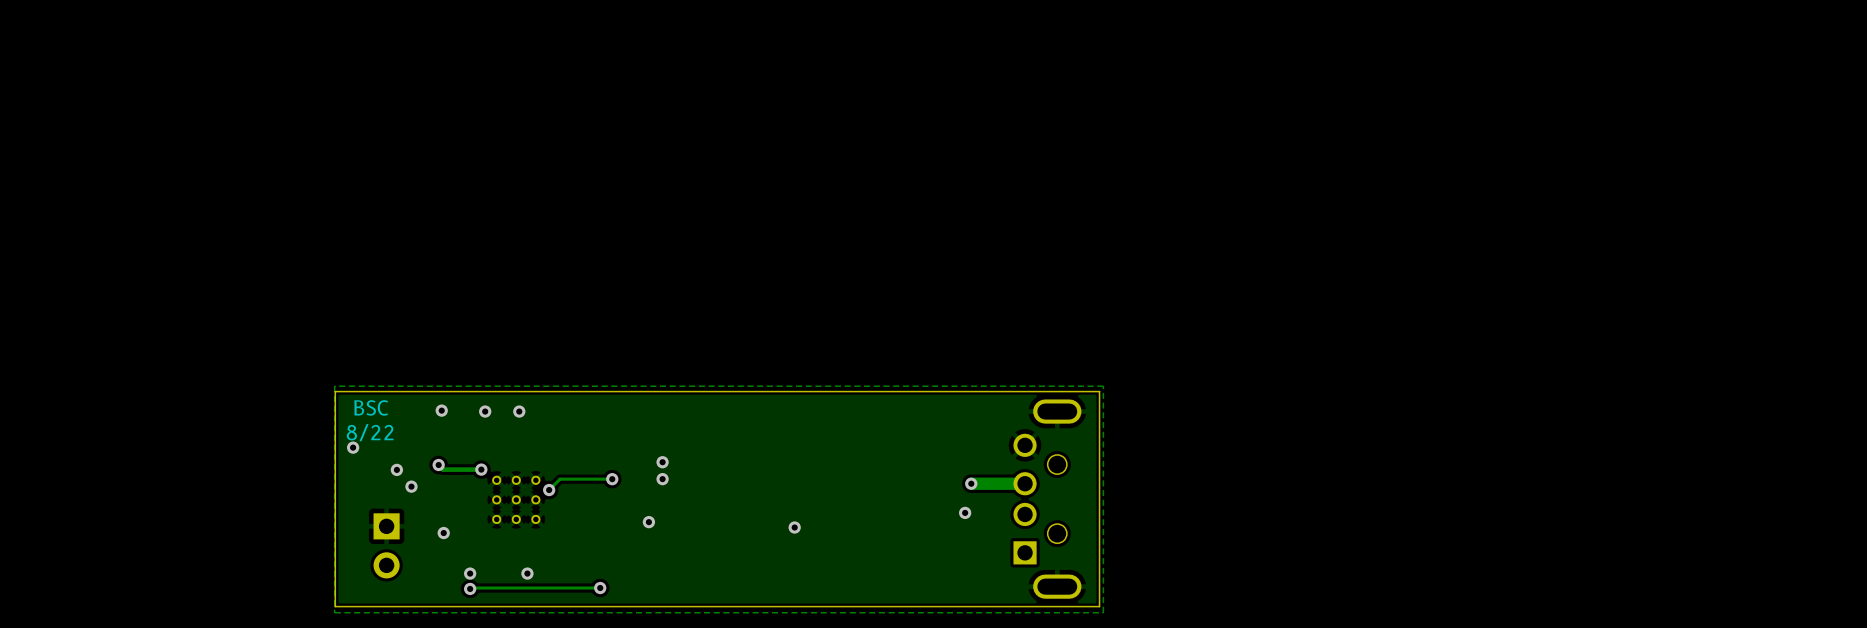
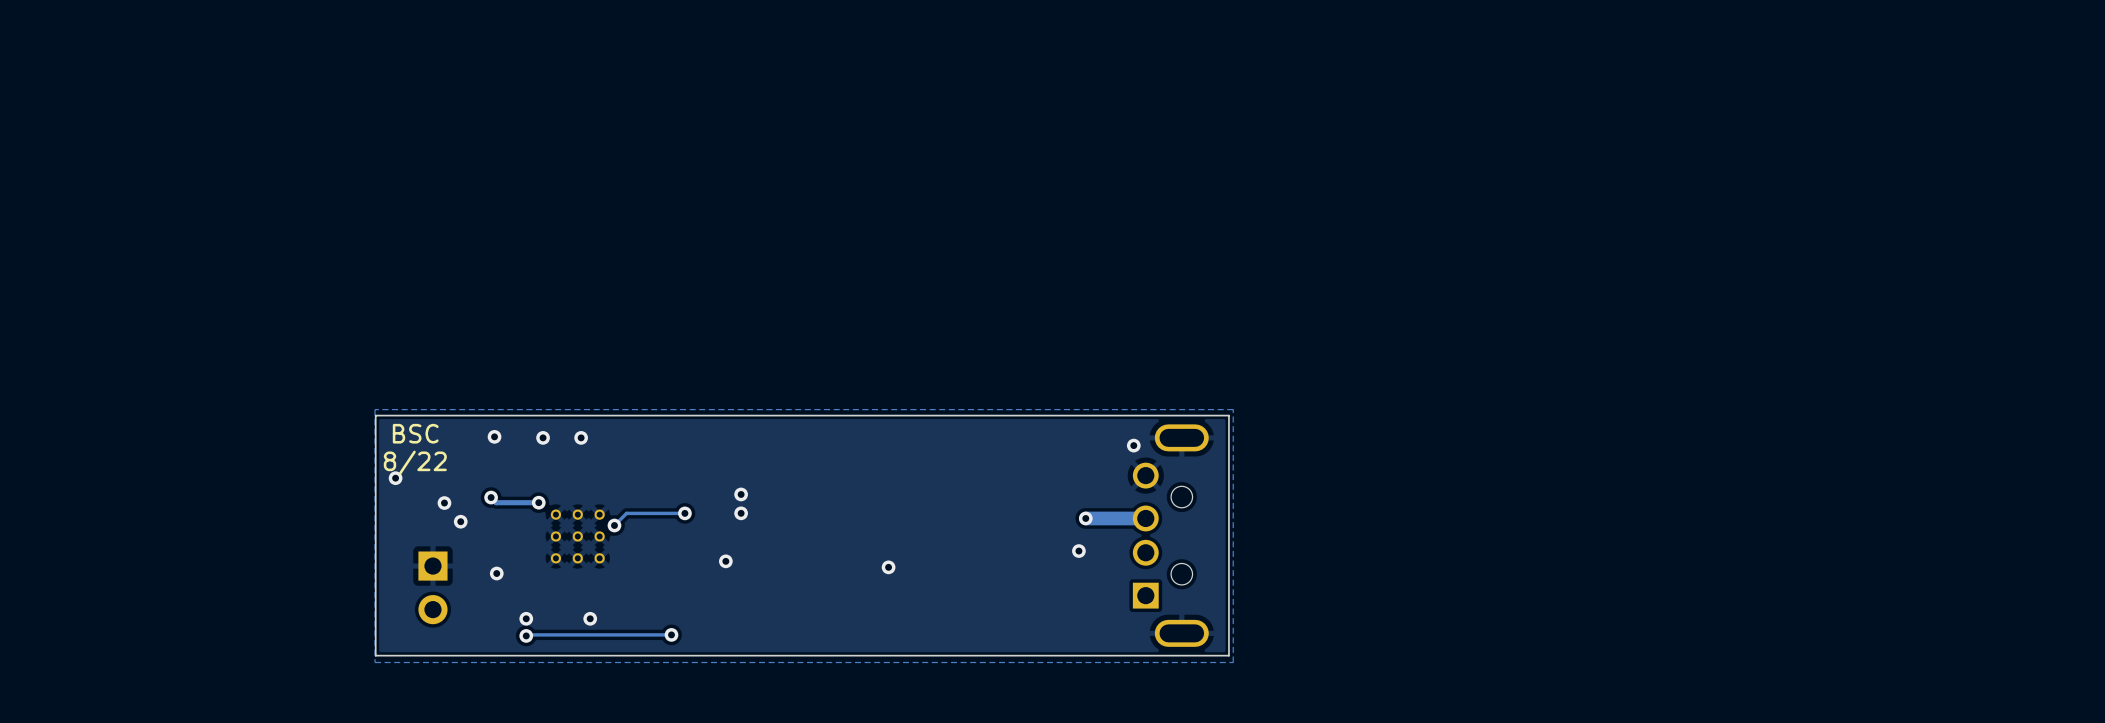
via: none -> (1133, 445)

